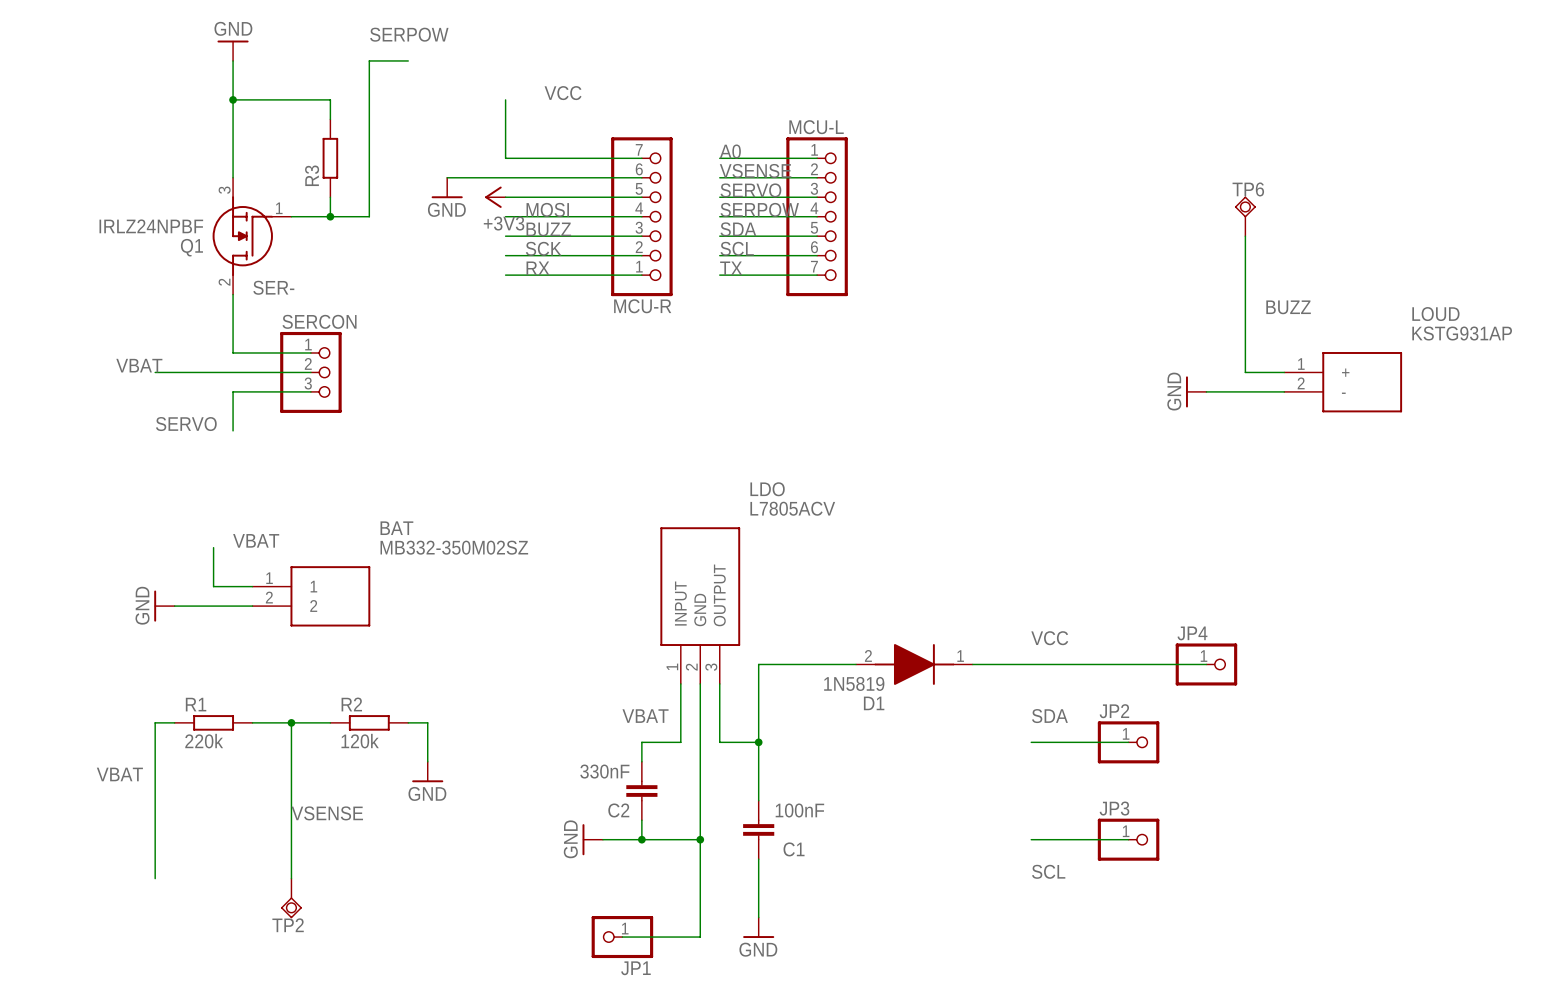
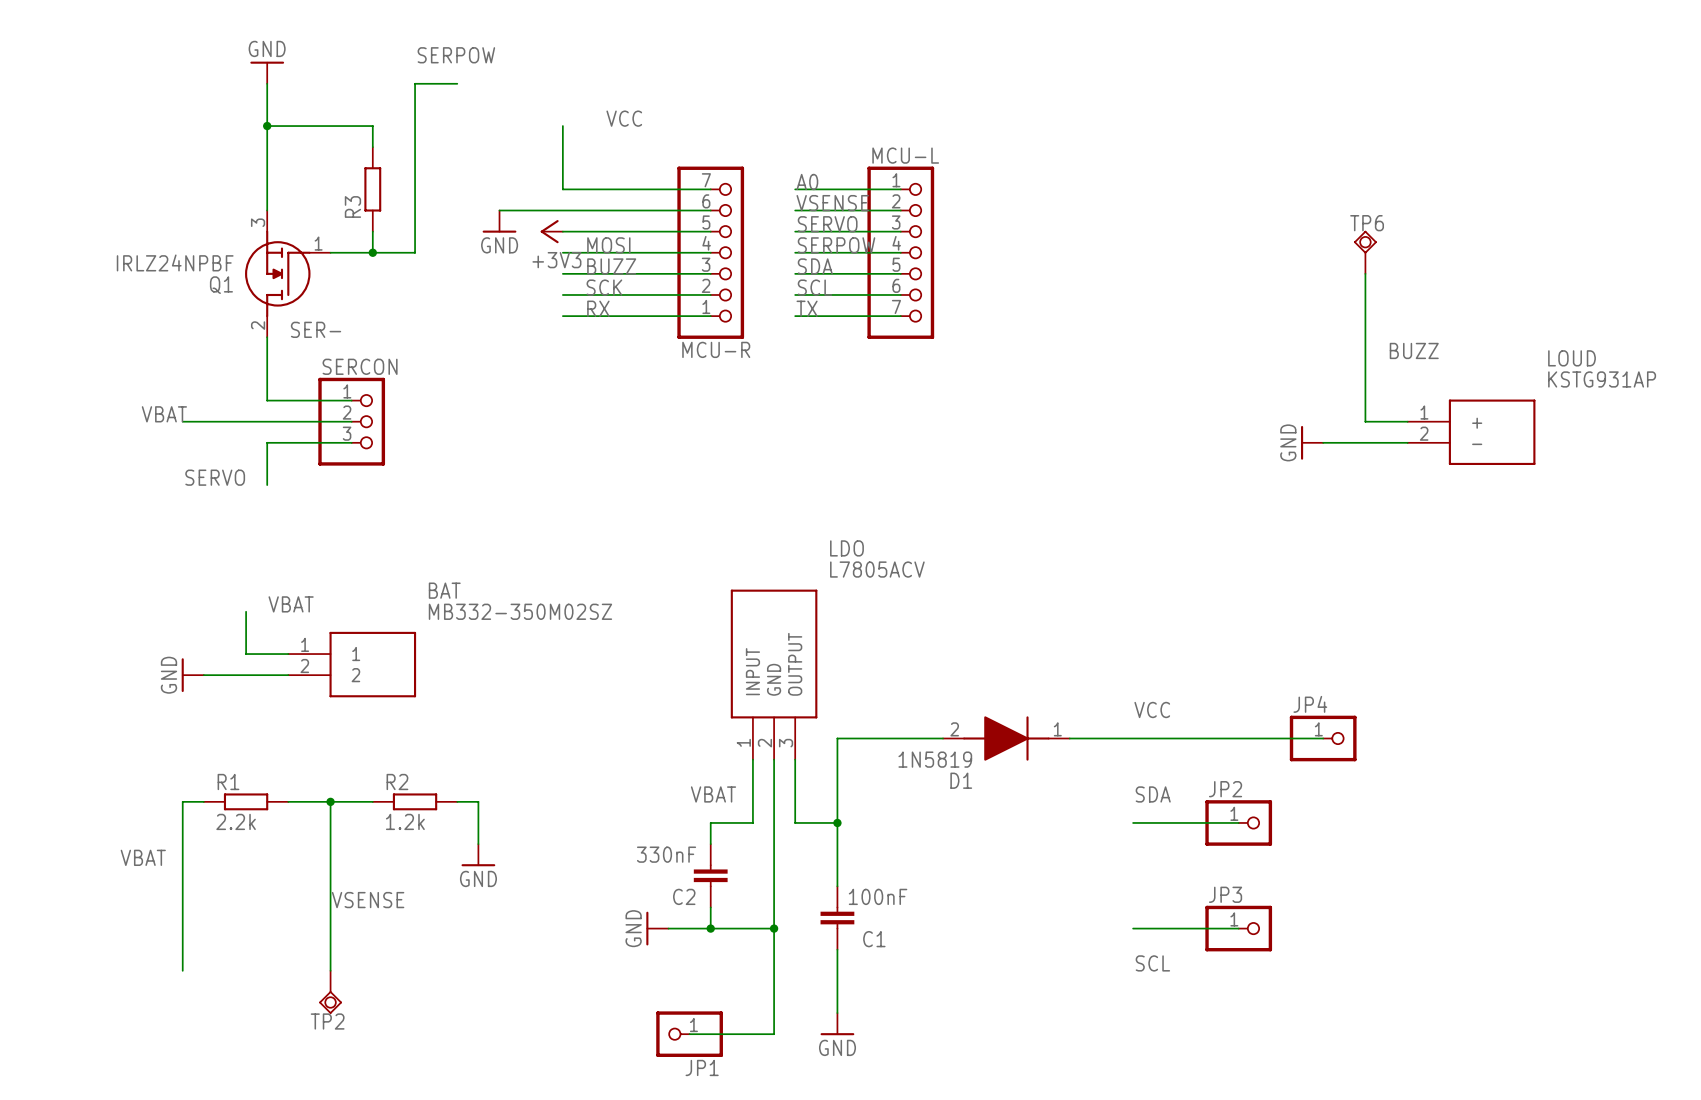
R1 value: 220k (204, 741) -> 2.2k (236, 821)
R2 value: 120k (360, 741) -> 1.2k (405, 821)

